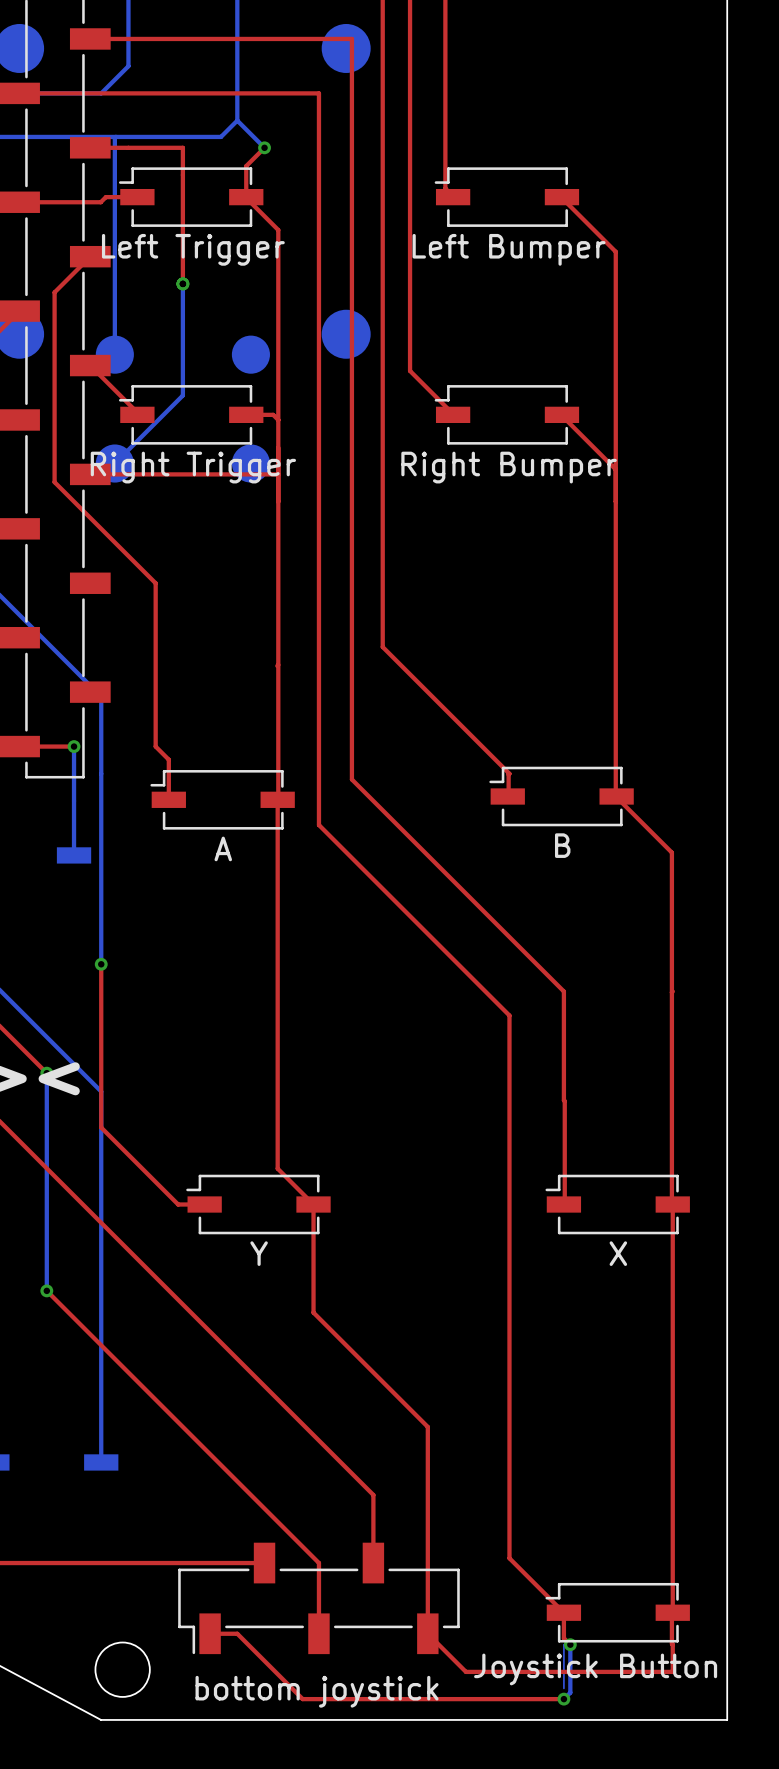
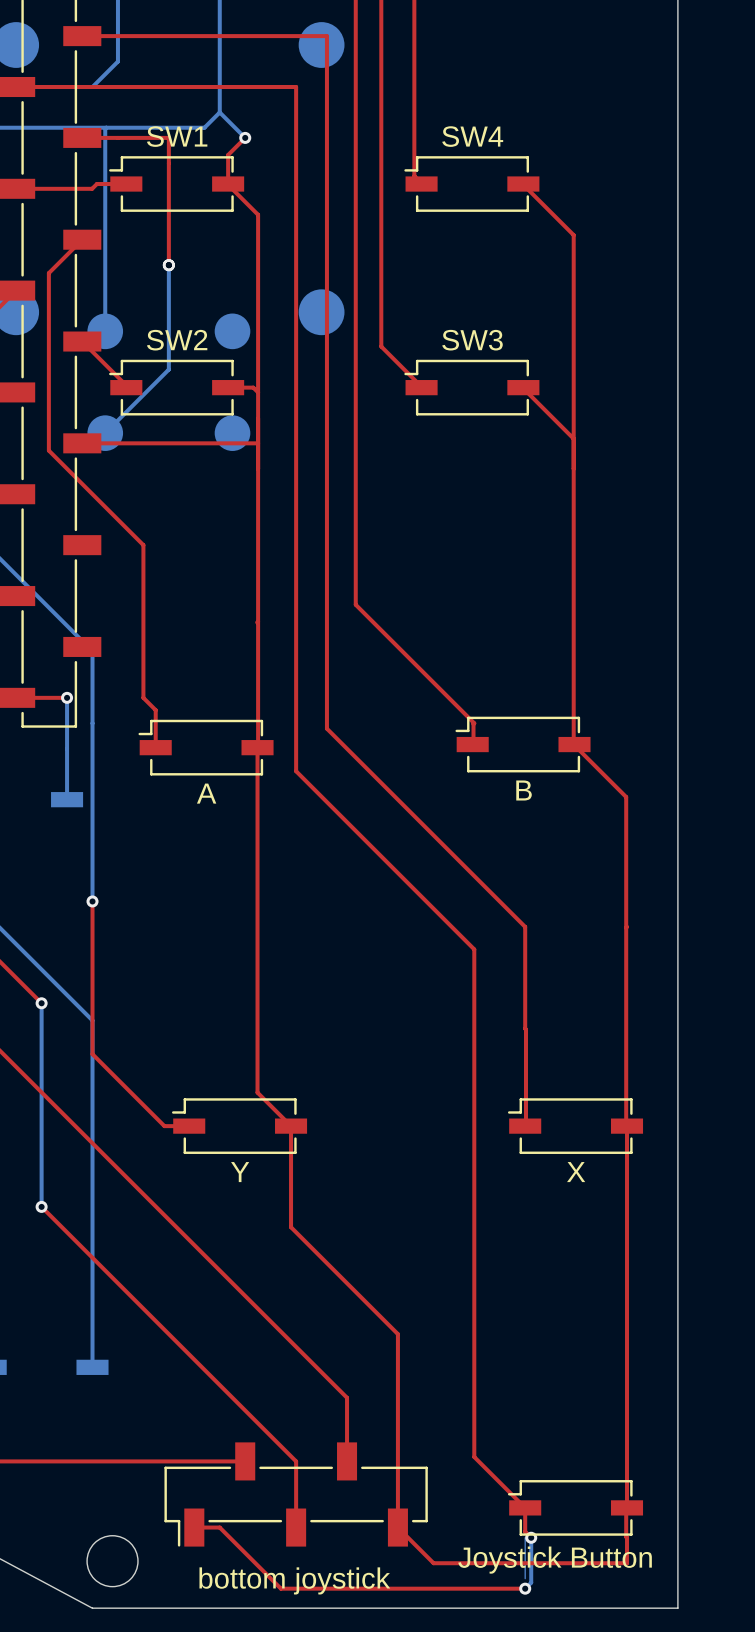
SW4 name: none -> SW4 (472, 136)
SW1 name: none -> SW1 (177, 136)
SW1 value: Left Trigger (193, 249) -> none
SW4 value: Left Bumper (509, 249) -> none
SW2 name: none -> SW2 (177, 340)
SW3 name: none -> SW3 (472, 340)
SW2 value: Right Trigger (193, 467) -> none
SW3 value: Right Bumper (509, 467) -> none

